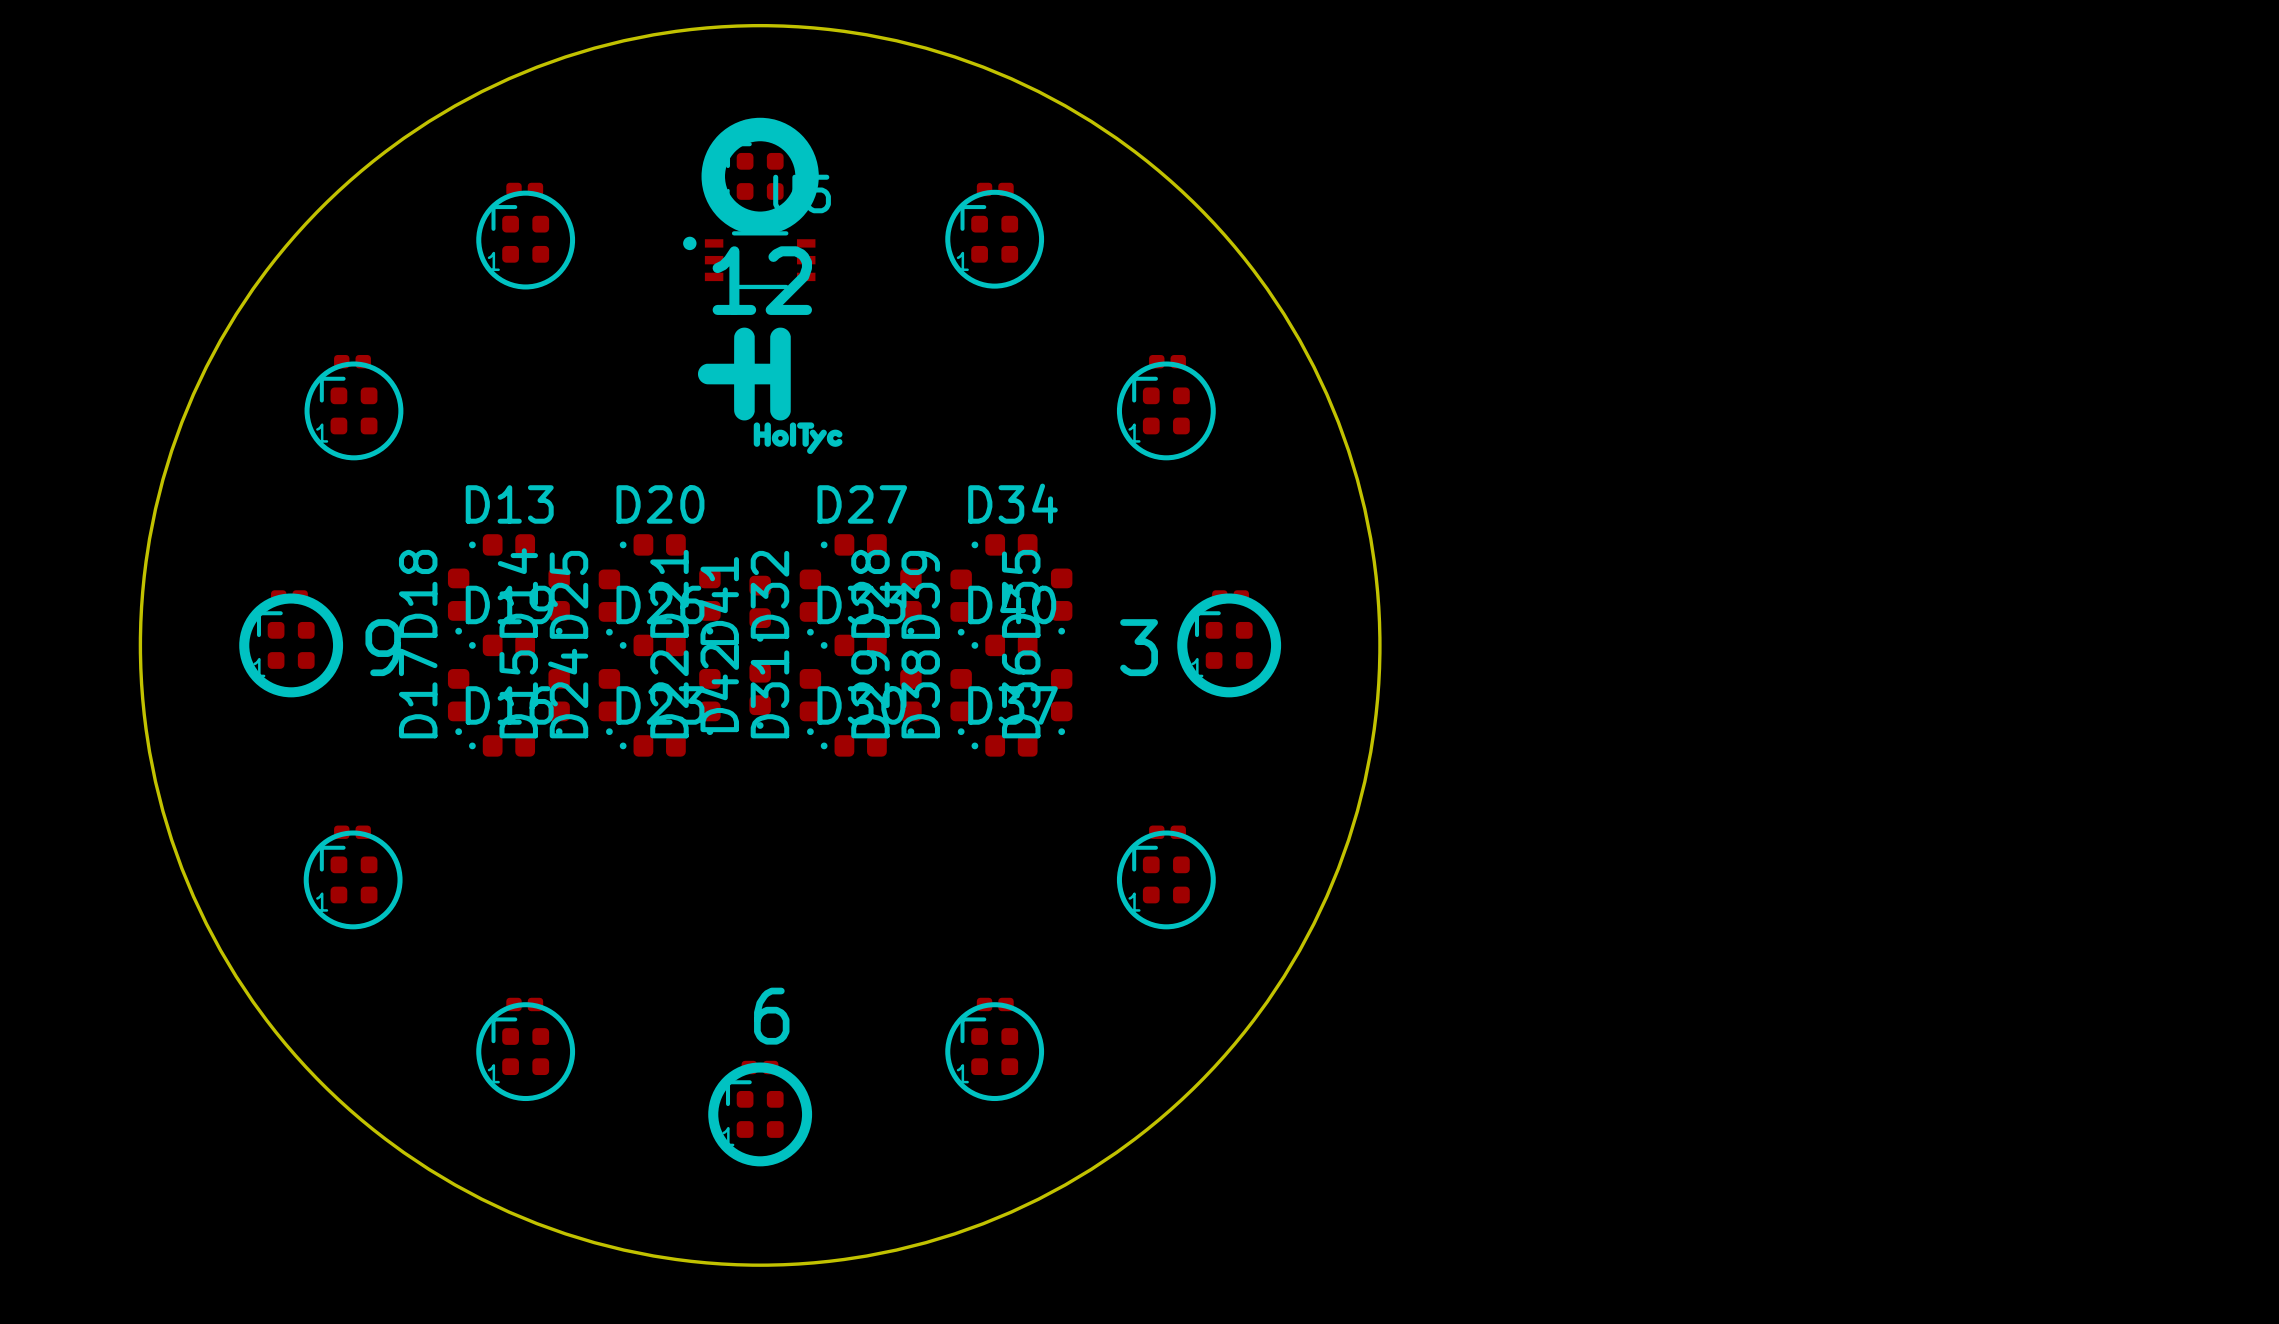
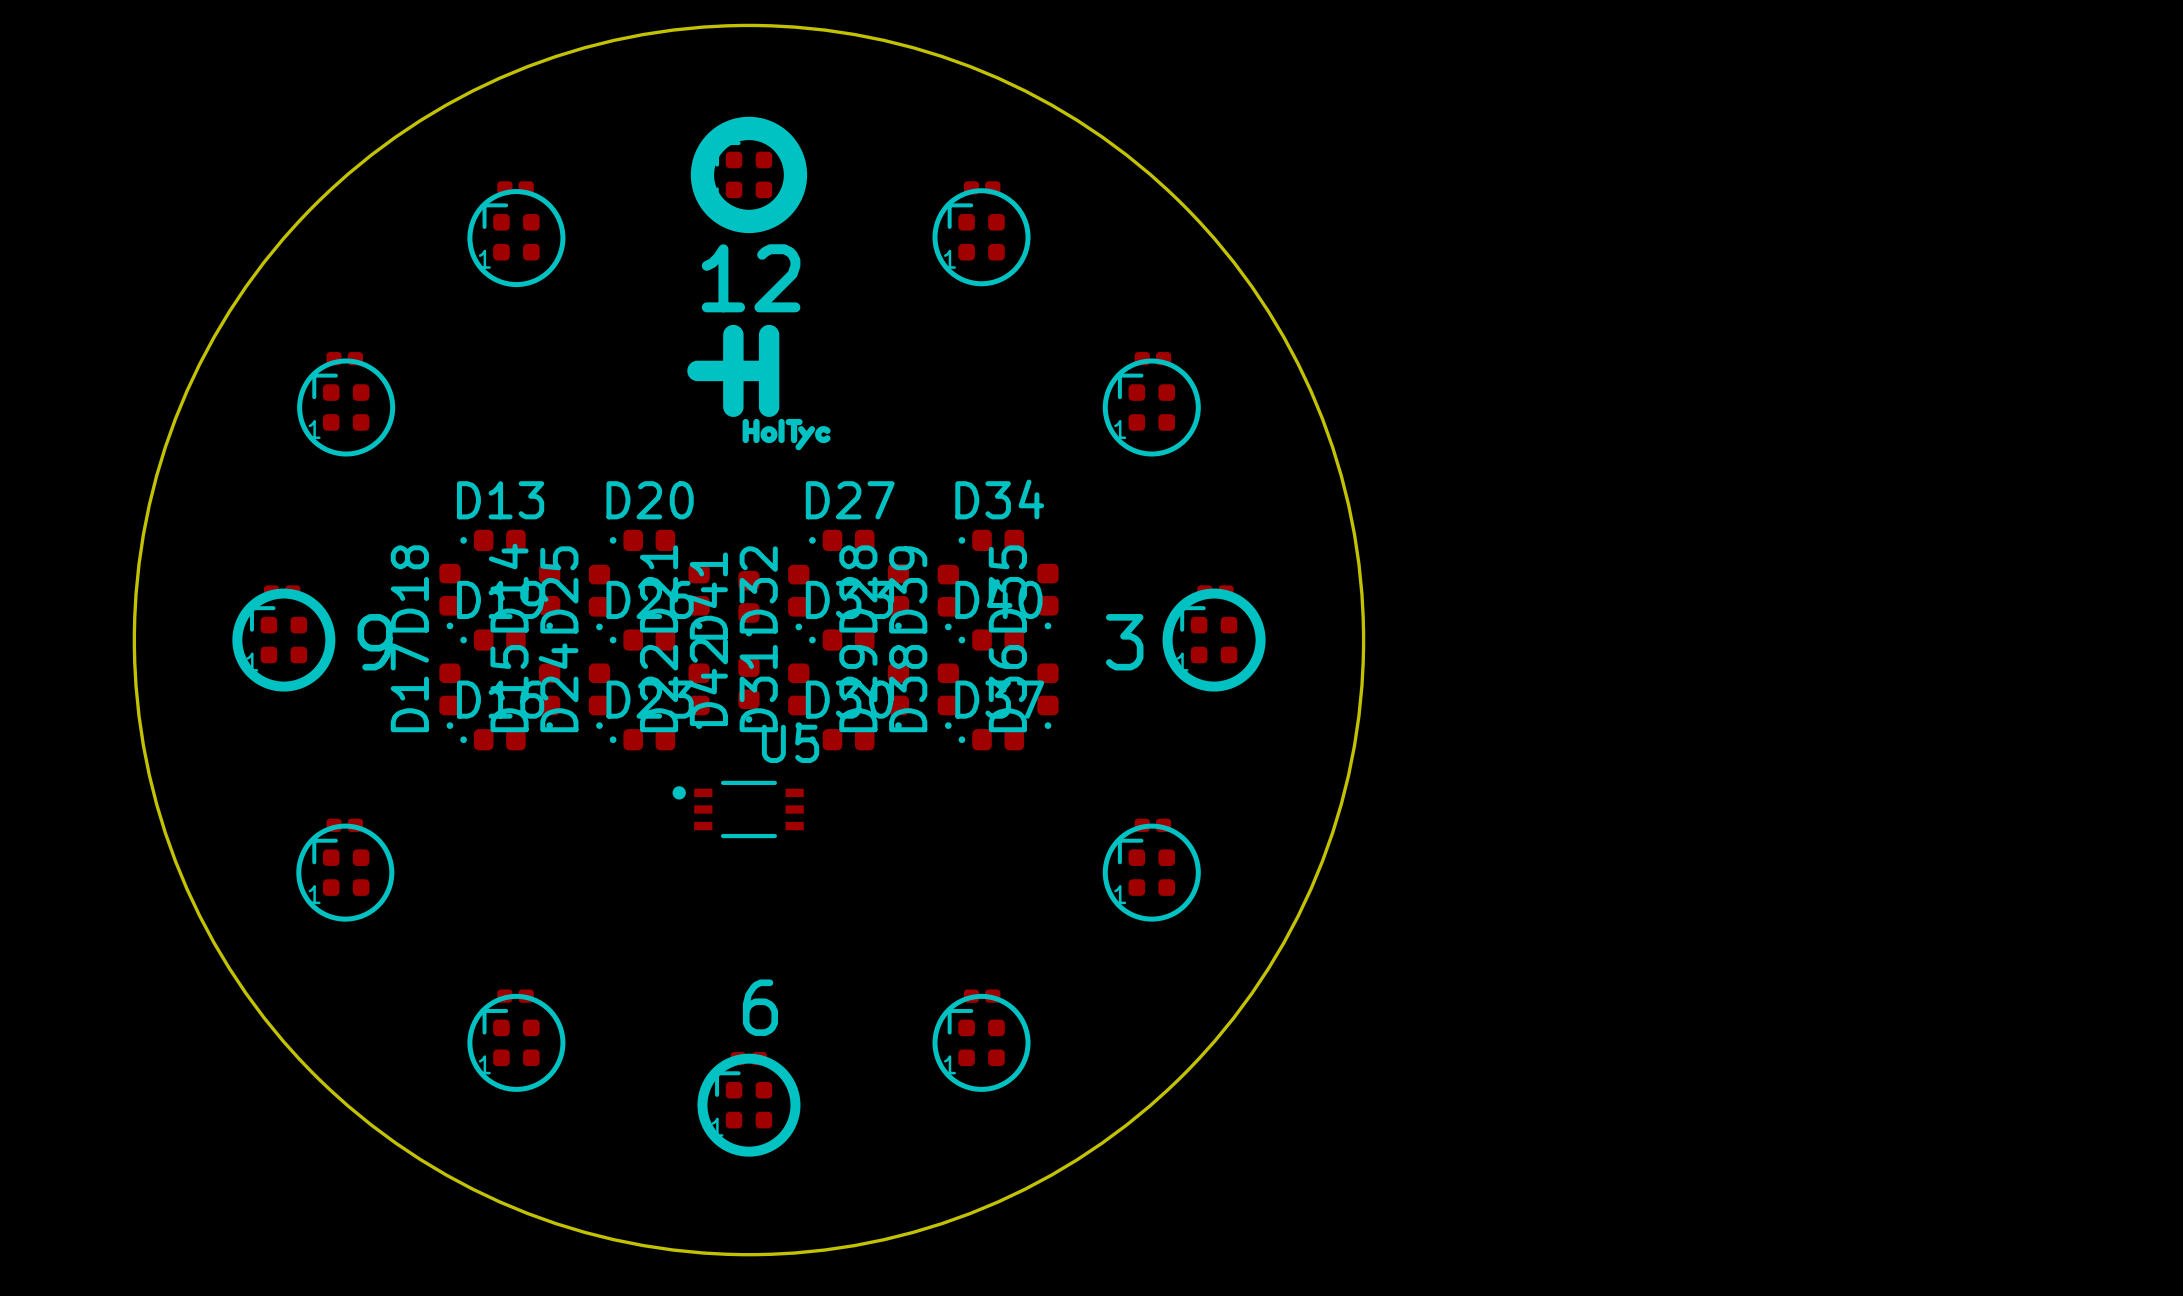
U5 position: (749, 260) -> (738, 809)

